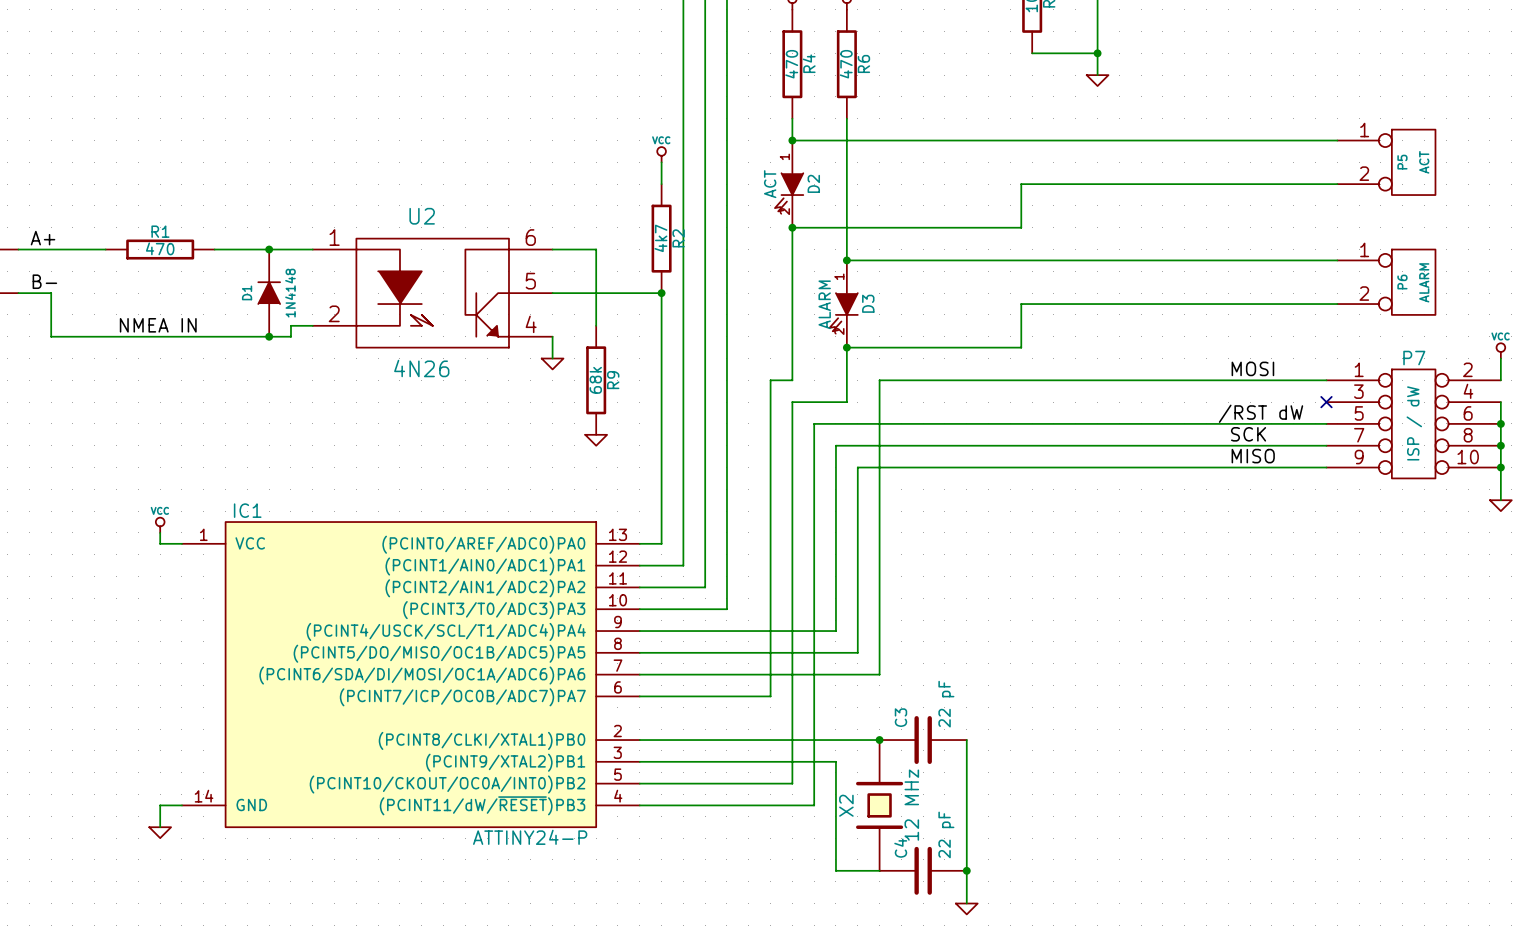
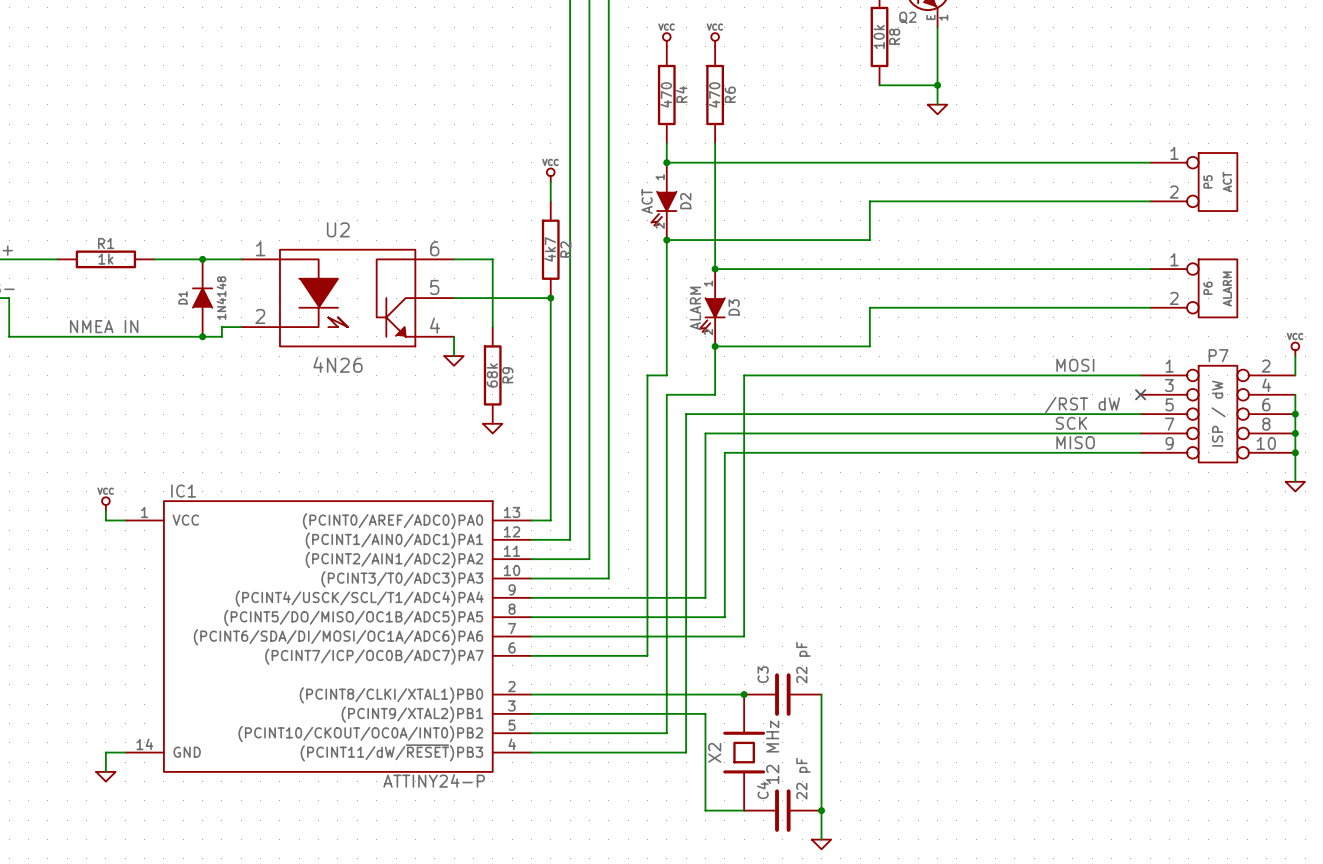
R1 value: 470 (160, 248) -> 1k (105, 259)

